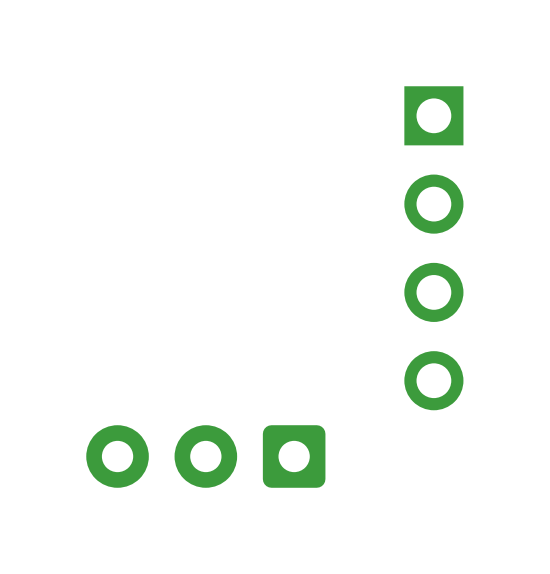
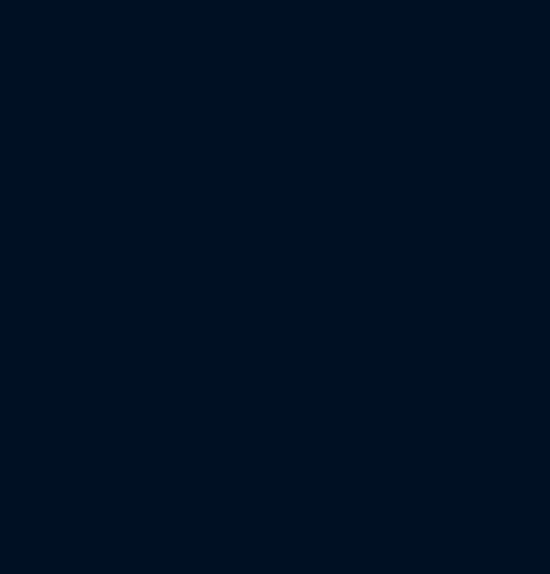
part: (433, 248) -> none
part: (205, 456) -> none

